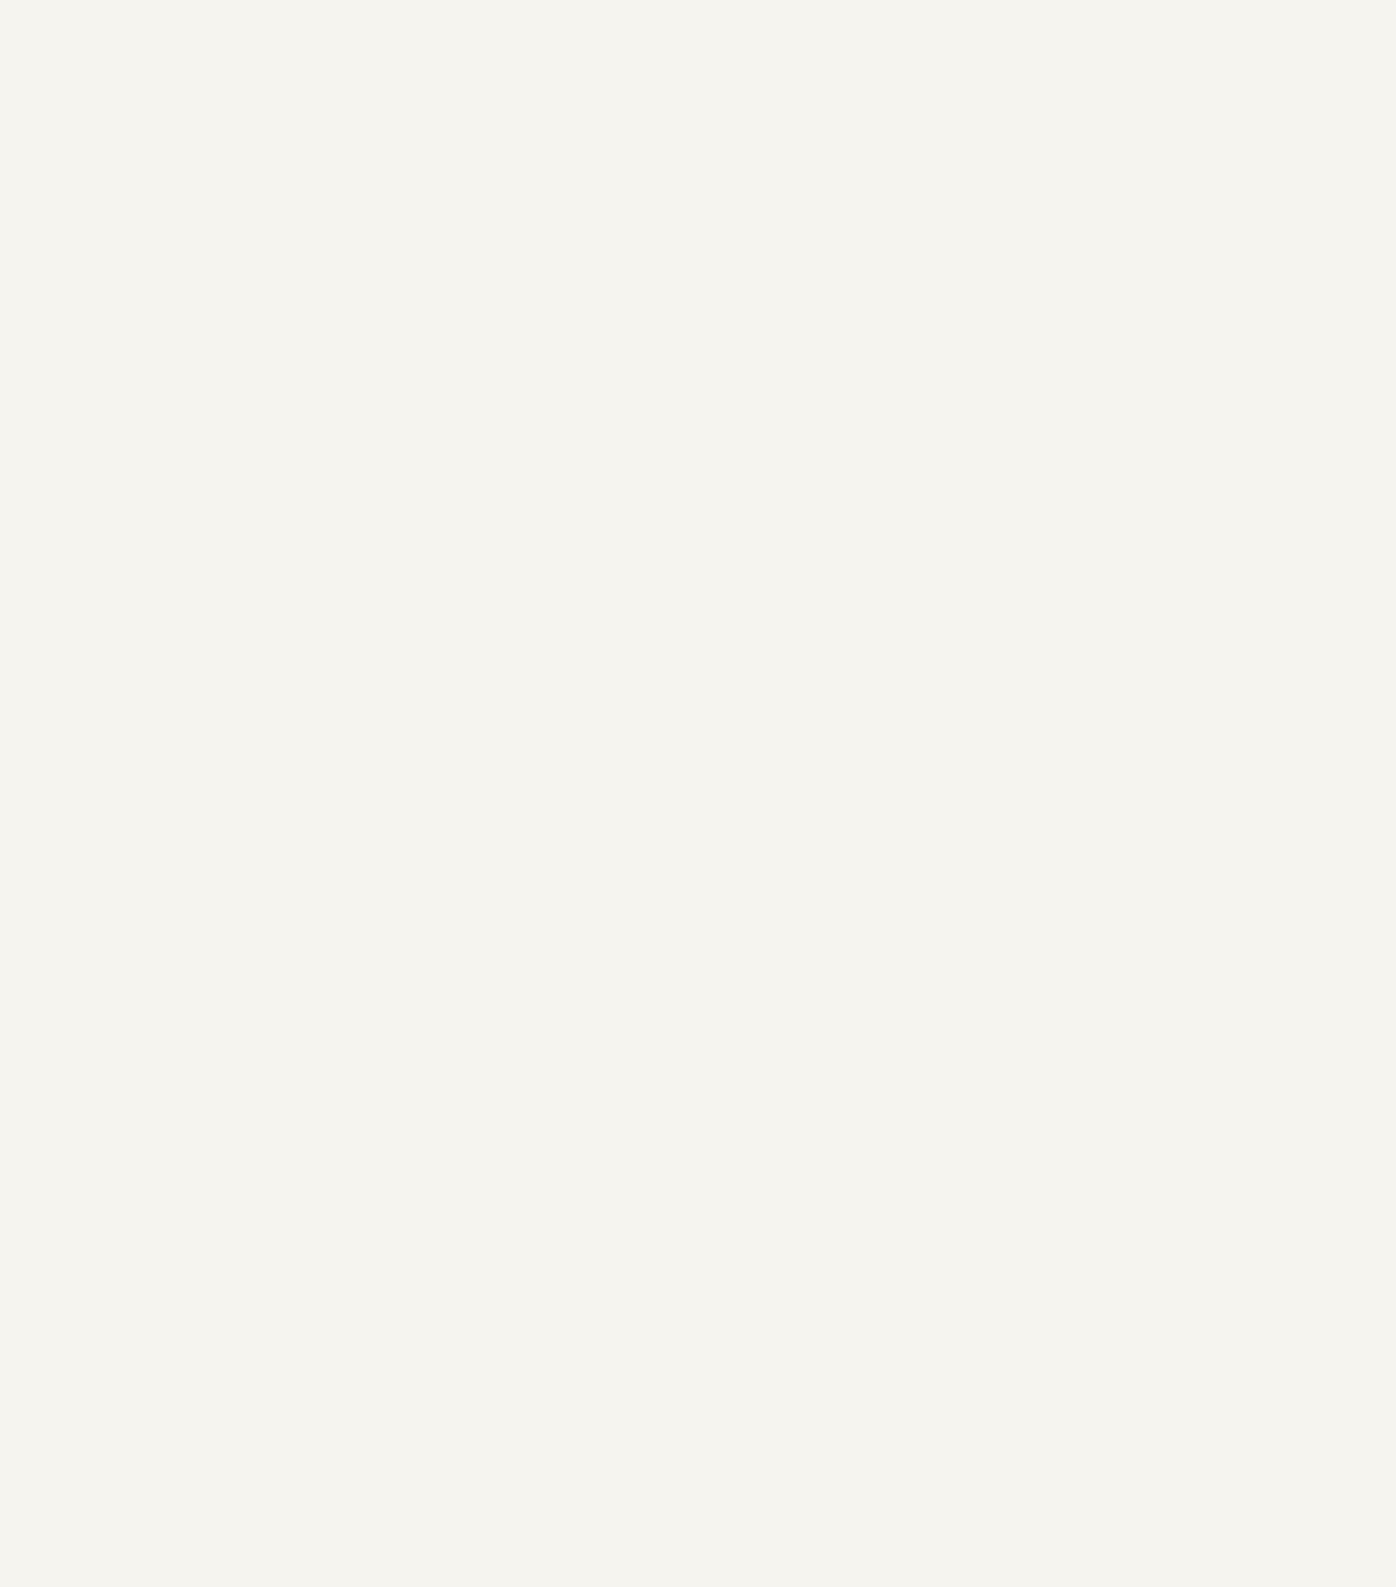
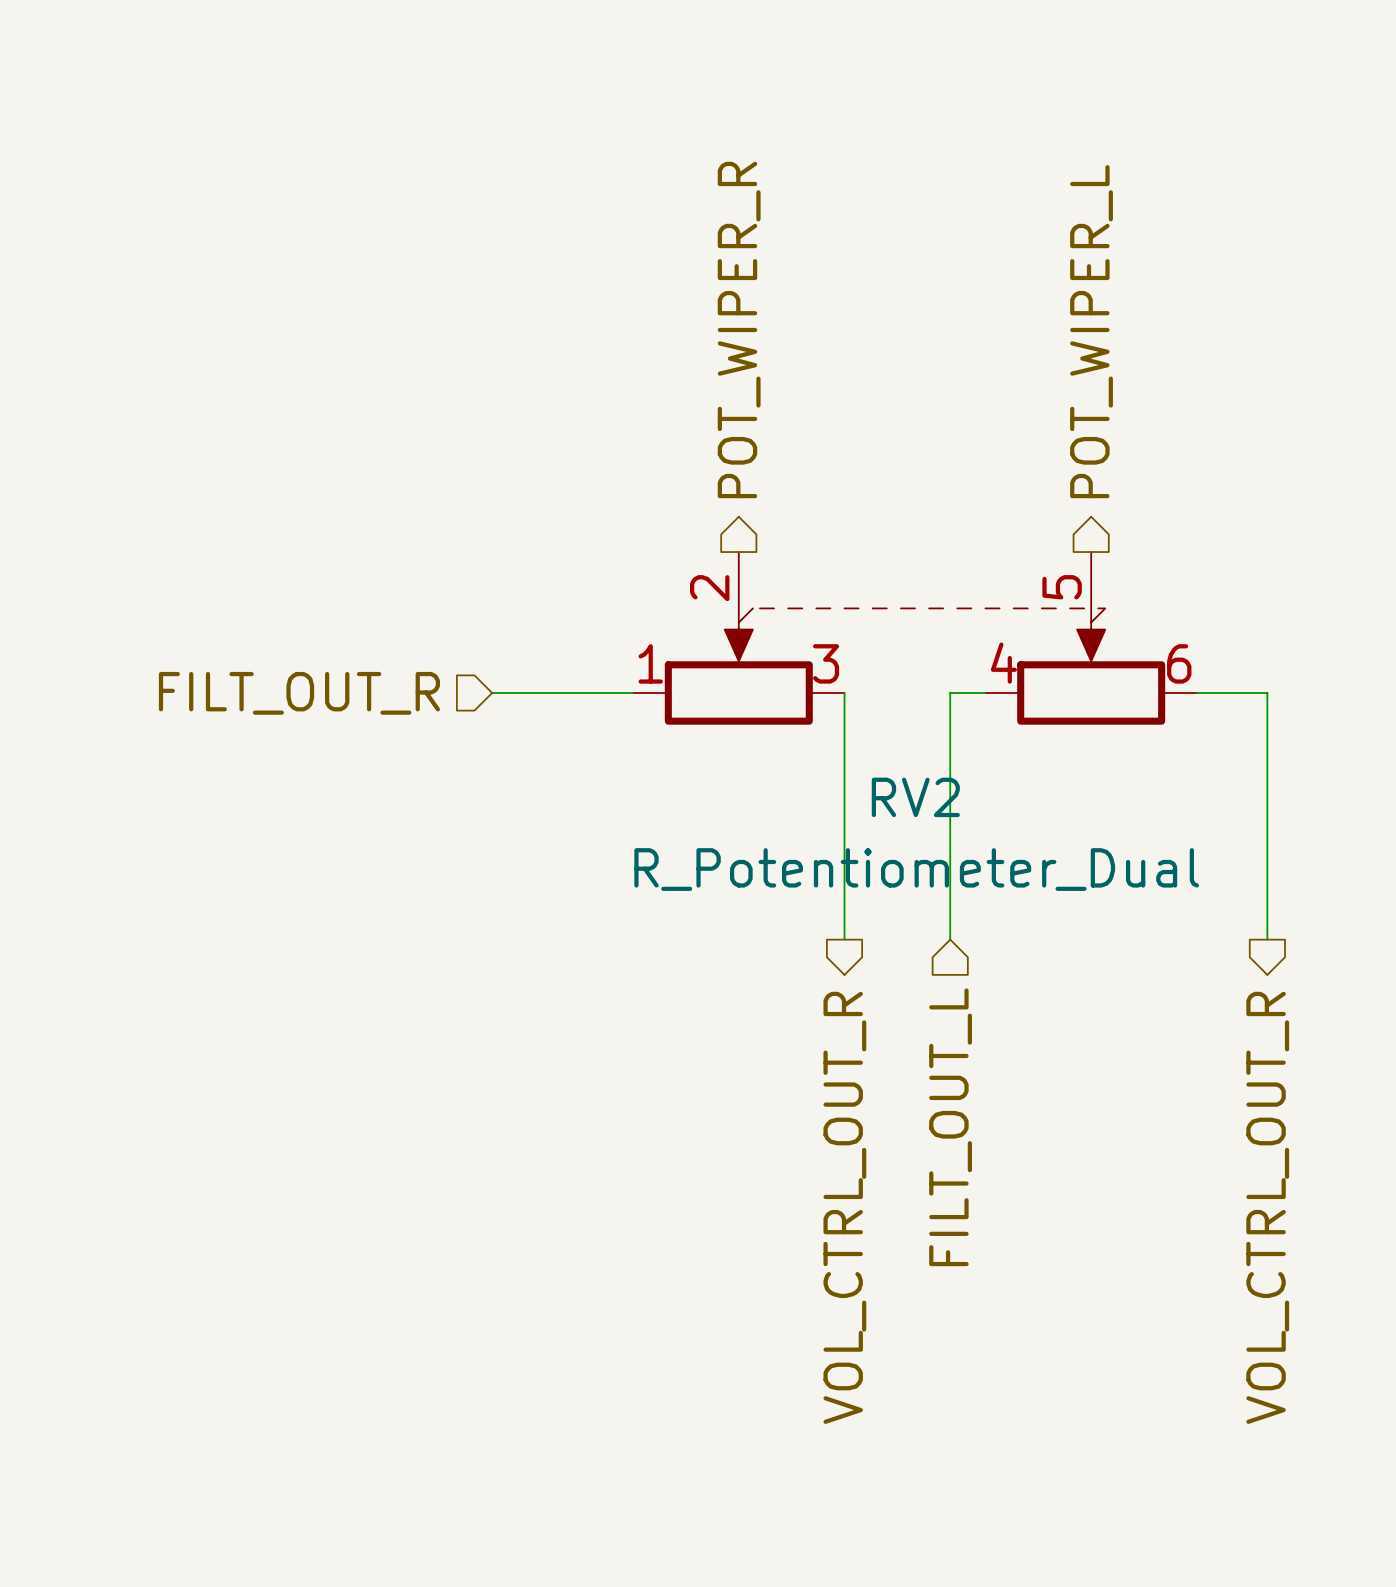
hierarchical label: none -> POT_WIPER_R (739, 329)
hierarchical label: none -> POT_WIPER_L (1091, 331)
RV2: none -> R_Potentiometer_Dual (914, 638)
wire: none -> (492, 692) (633, 692)
wire: none -> (844, 692) (844, 939)
wire: none -> (985, 692) (950, 692) (950, 939)
wire: none -> (1196, 692) (1267, 692) (1267, 939)
hierarchical label: none -> FILT_OUT_R (299, 693)
hierarchical label: none -> FILT_OUT_L (950, 1127)
hierarchical label: none -> VOL_CTRL_OUT_R (844, 1207)
hierarchical label: none -> VOL_CTRL_OUT_R (1267, 1207)

